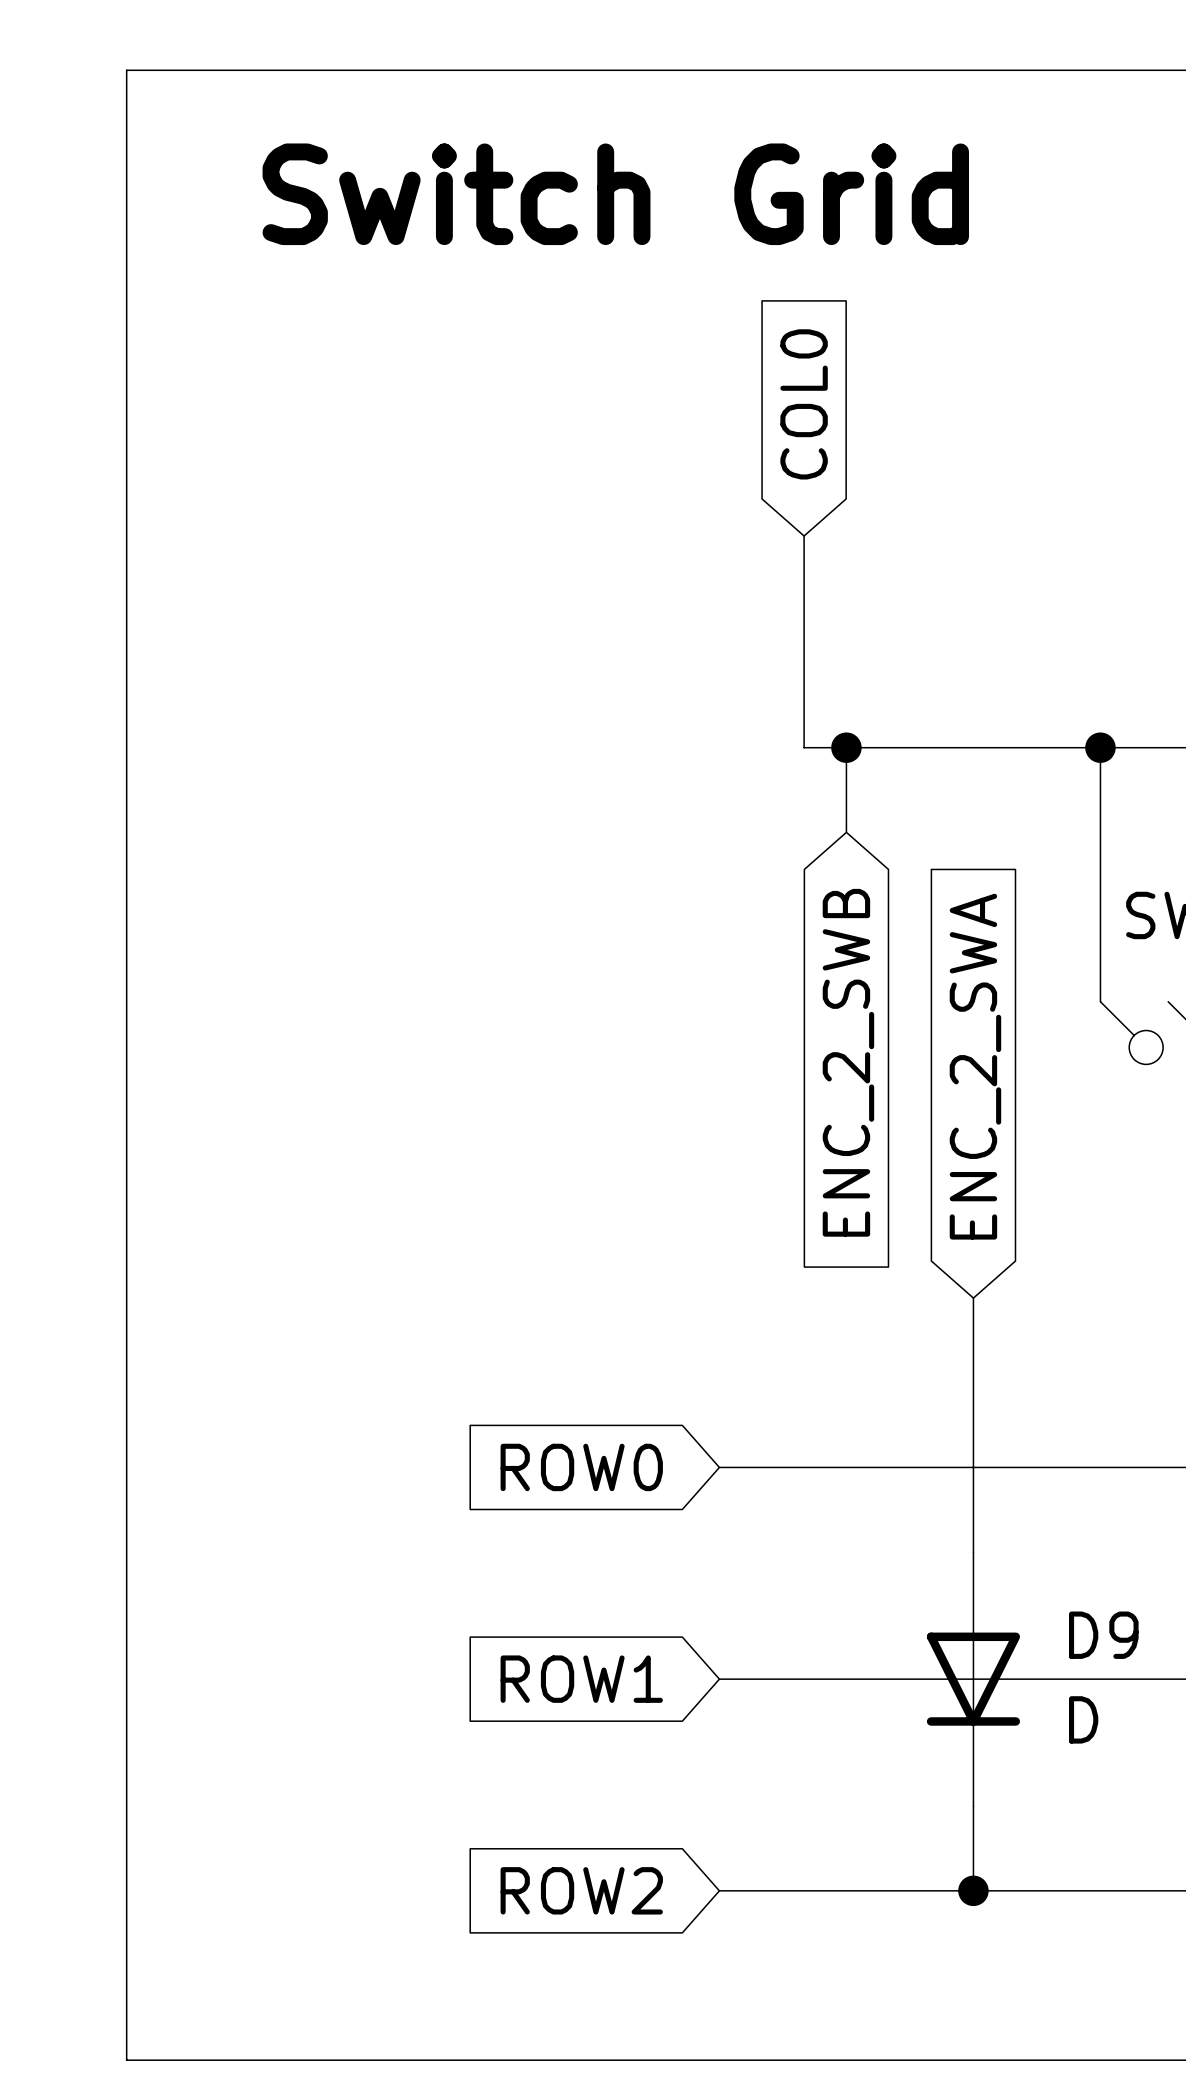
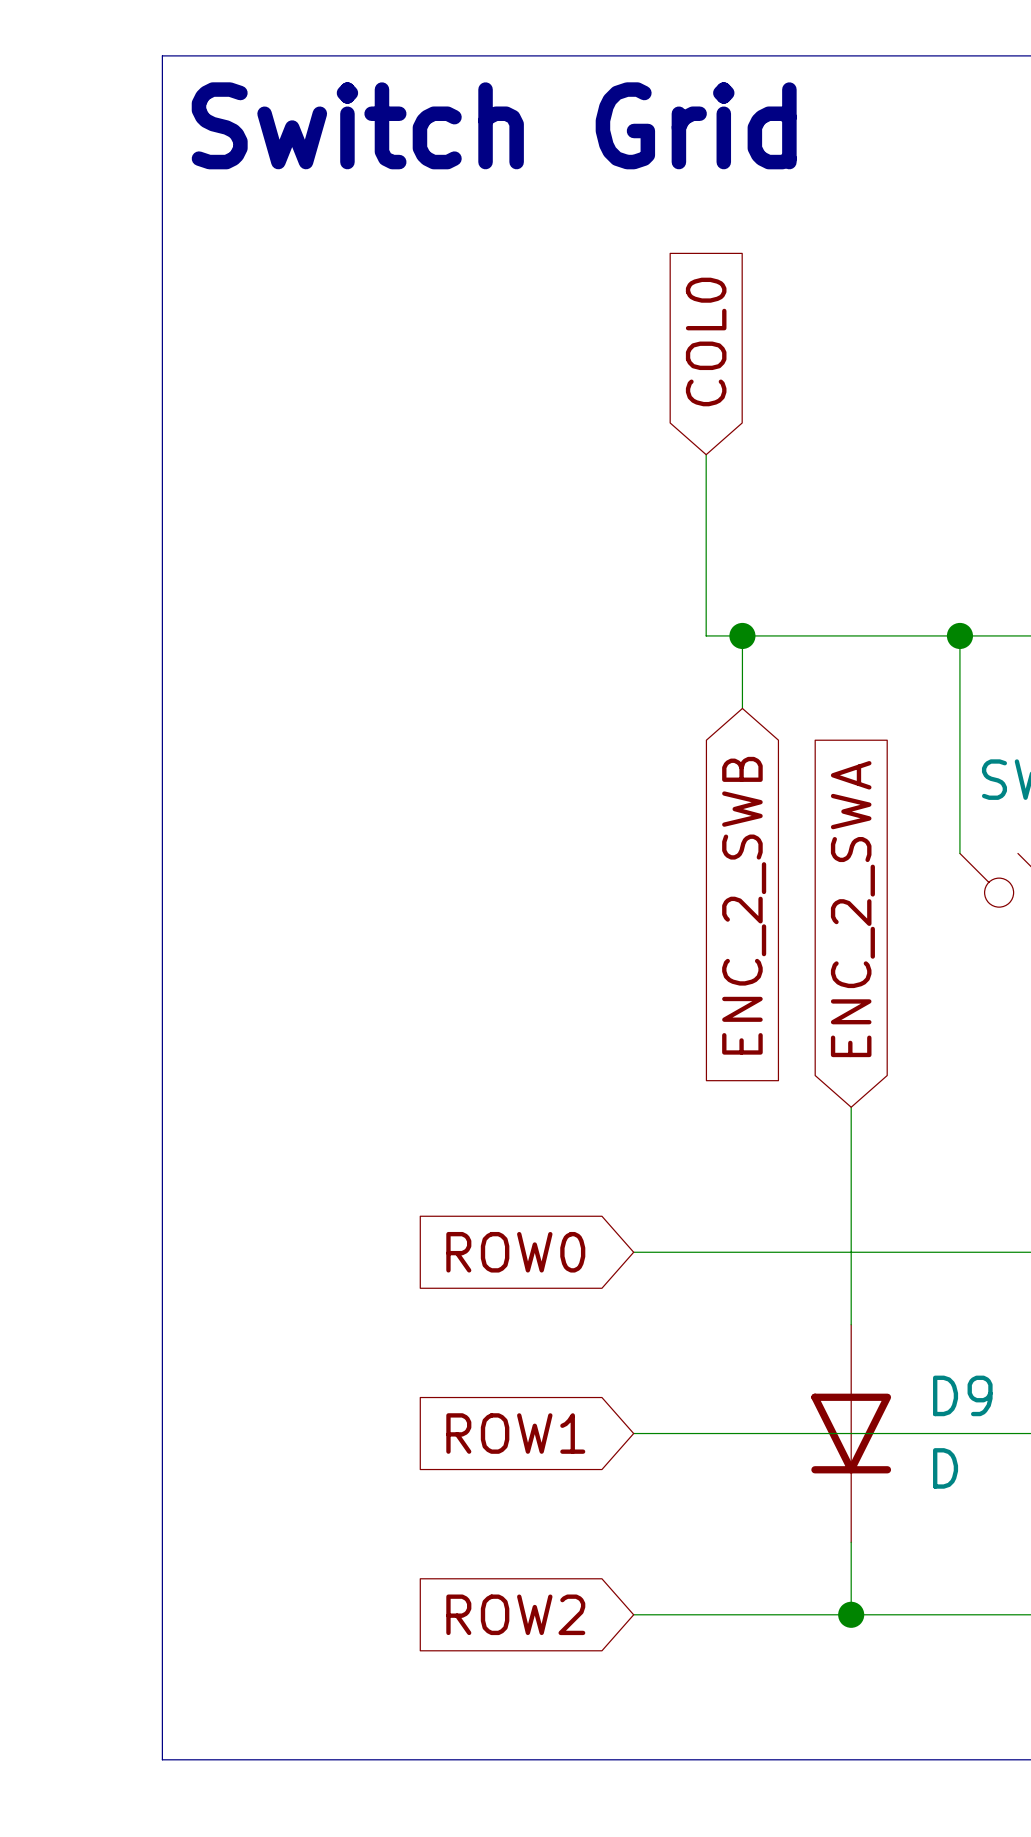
line: (169, 70) (126, 70) (126, 2060) (169, 2060) -> (162, 55) (162, 1759)
text position: Switch Grid (615, 194) -> Switch Grid (494, 125)

